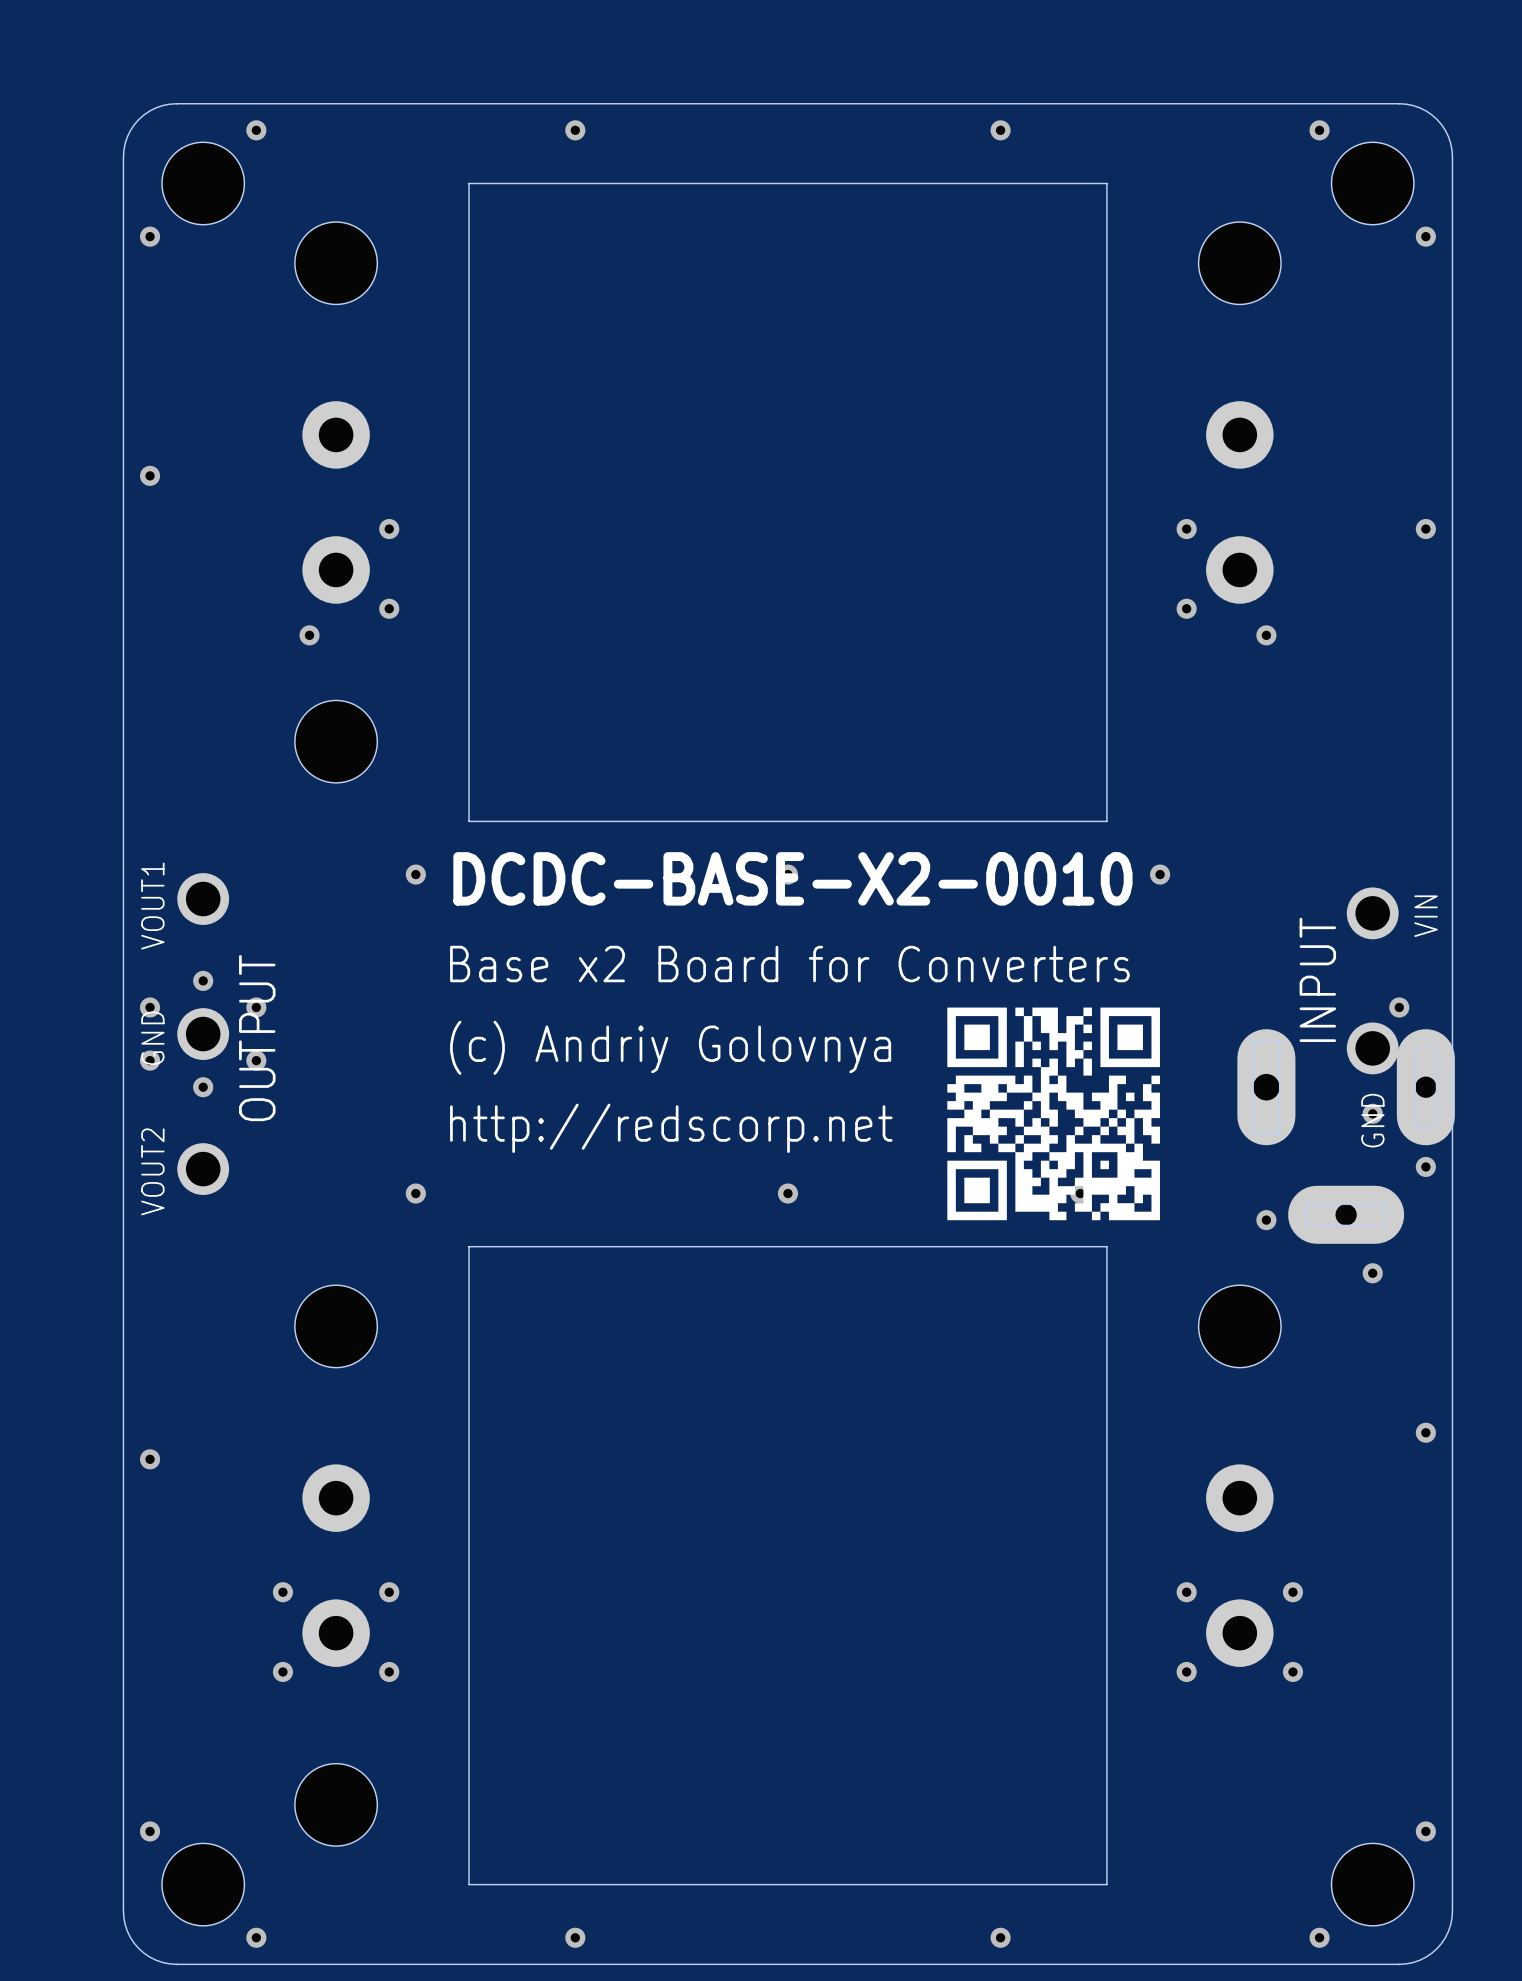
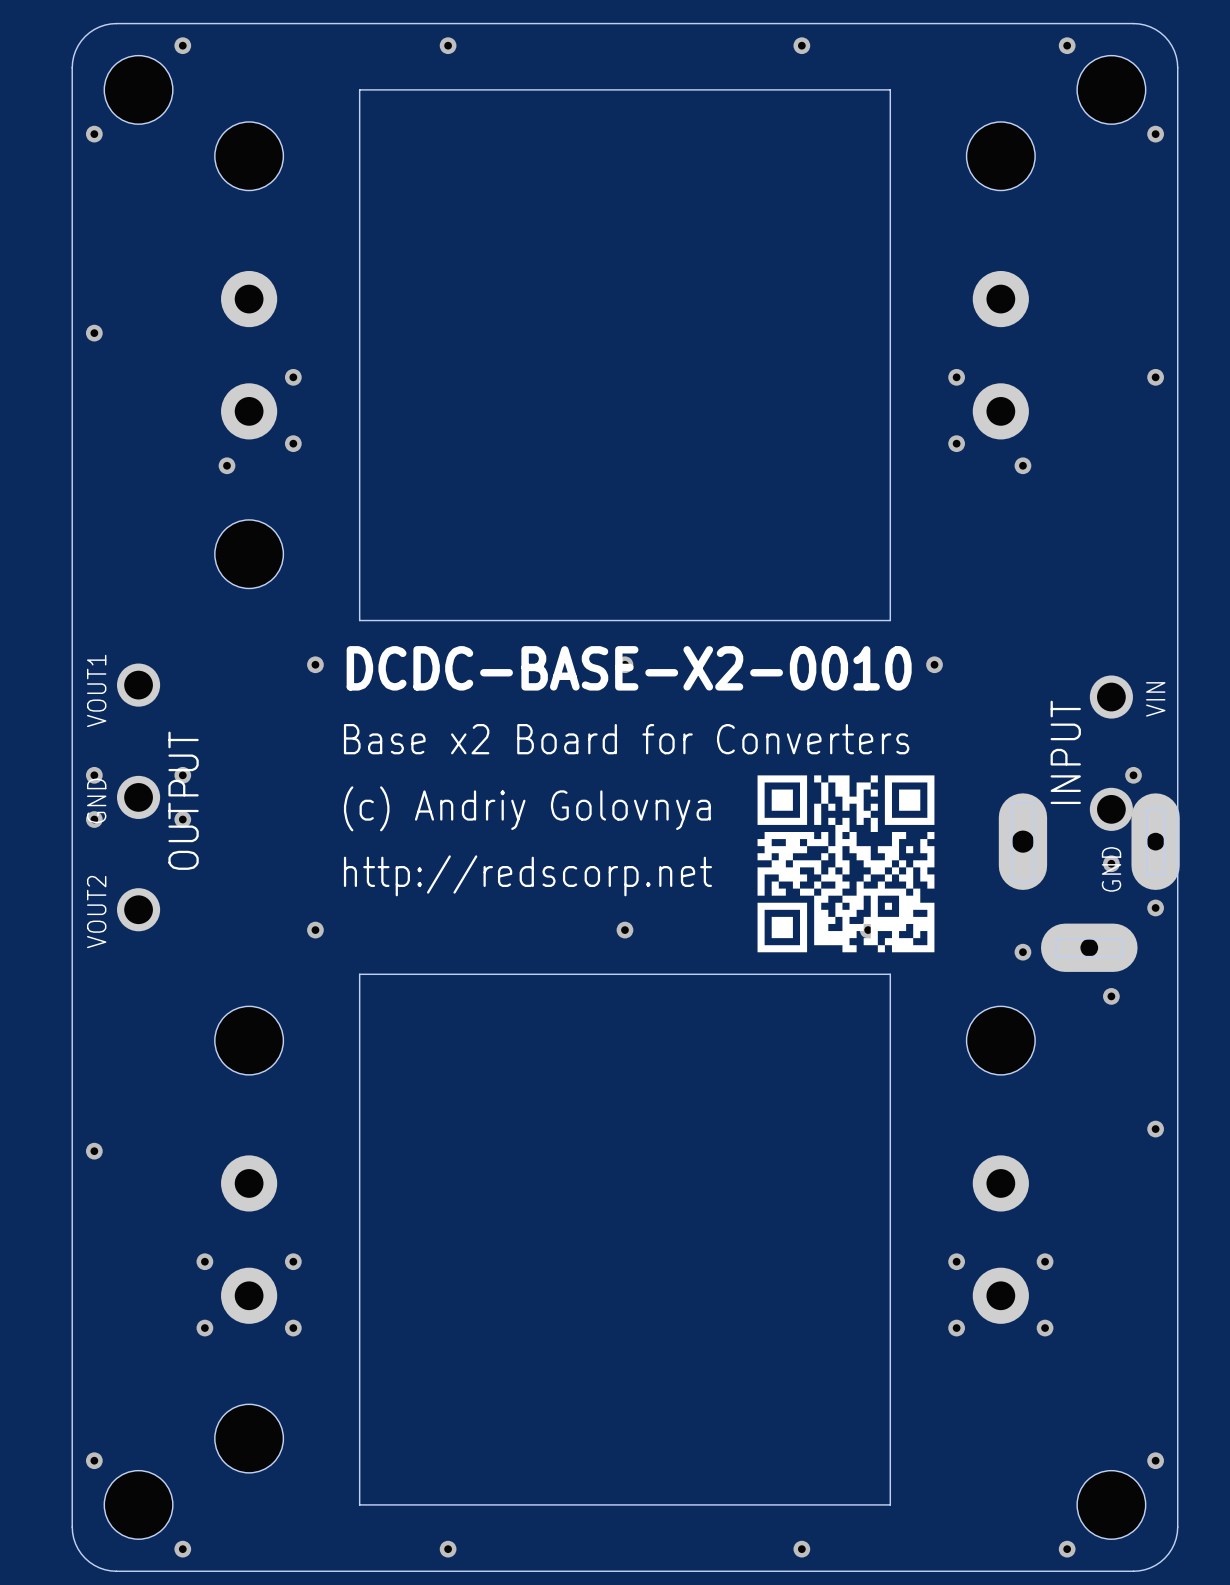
via: (203, 980) -> none
via: (203, 1087) -> none

